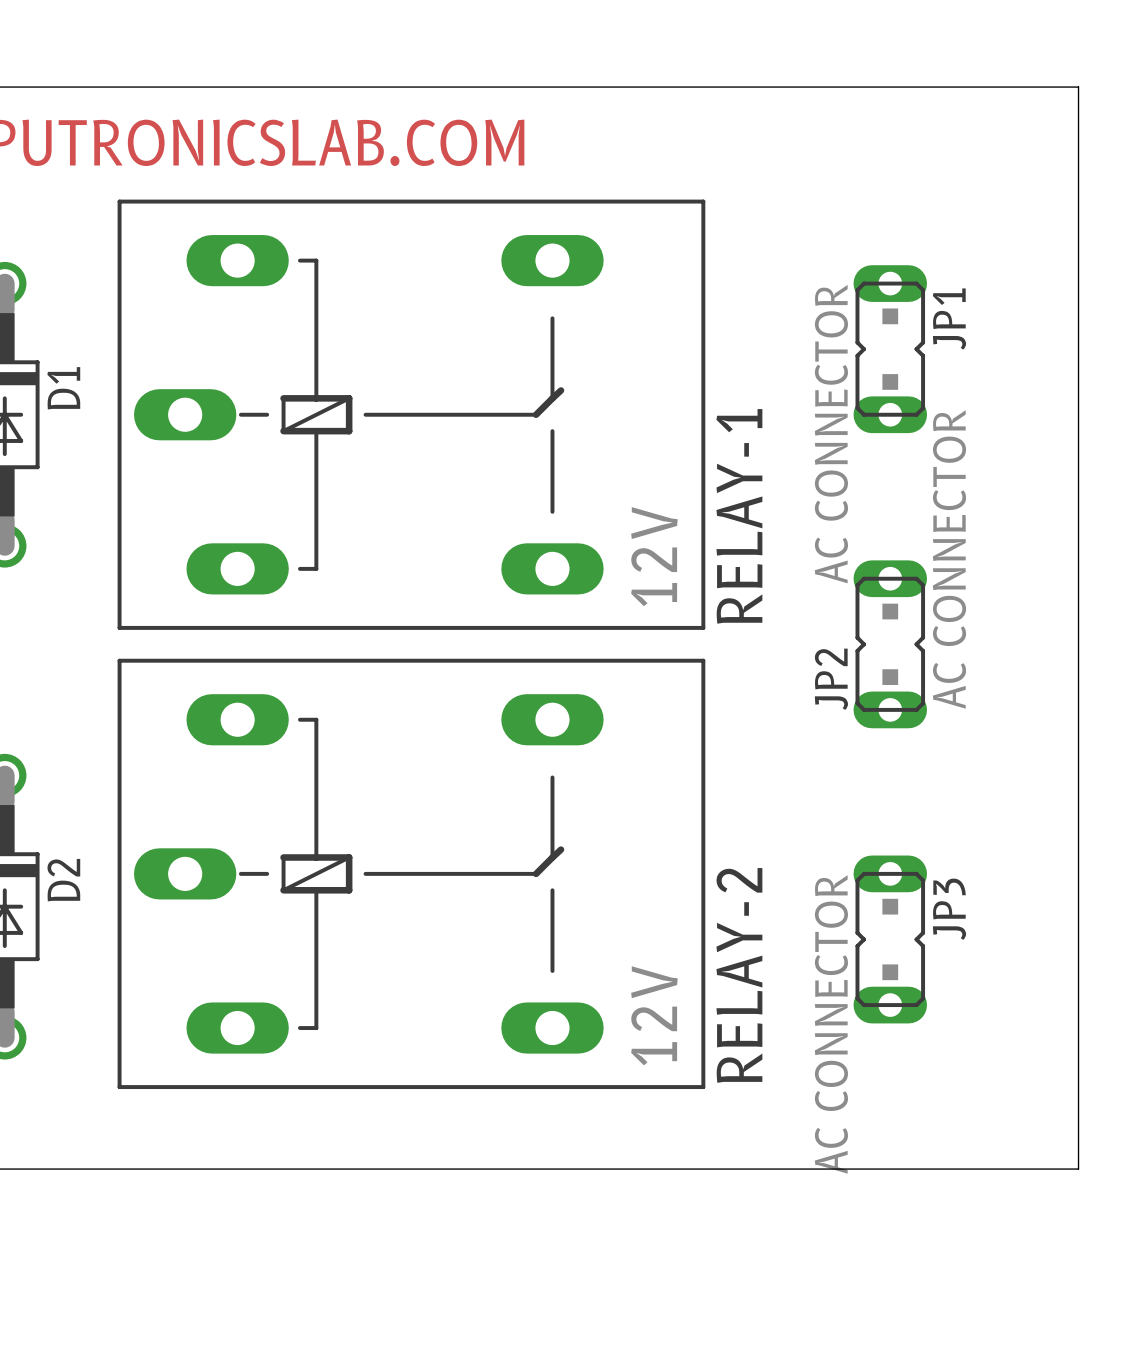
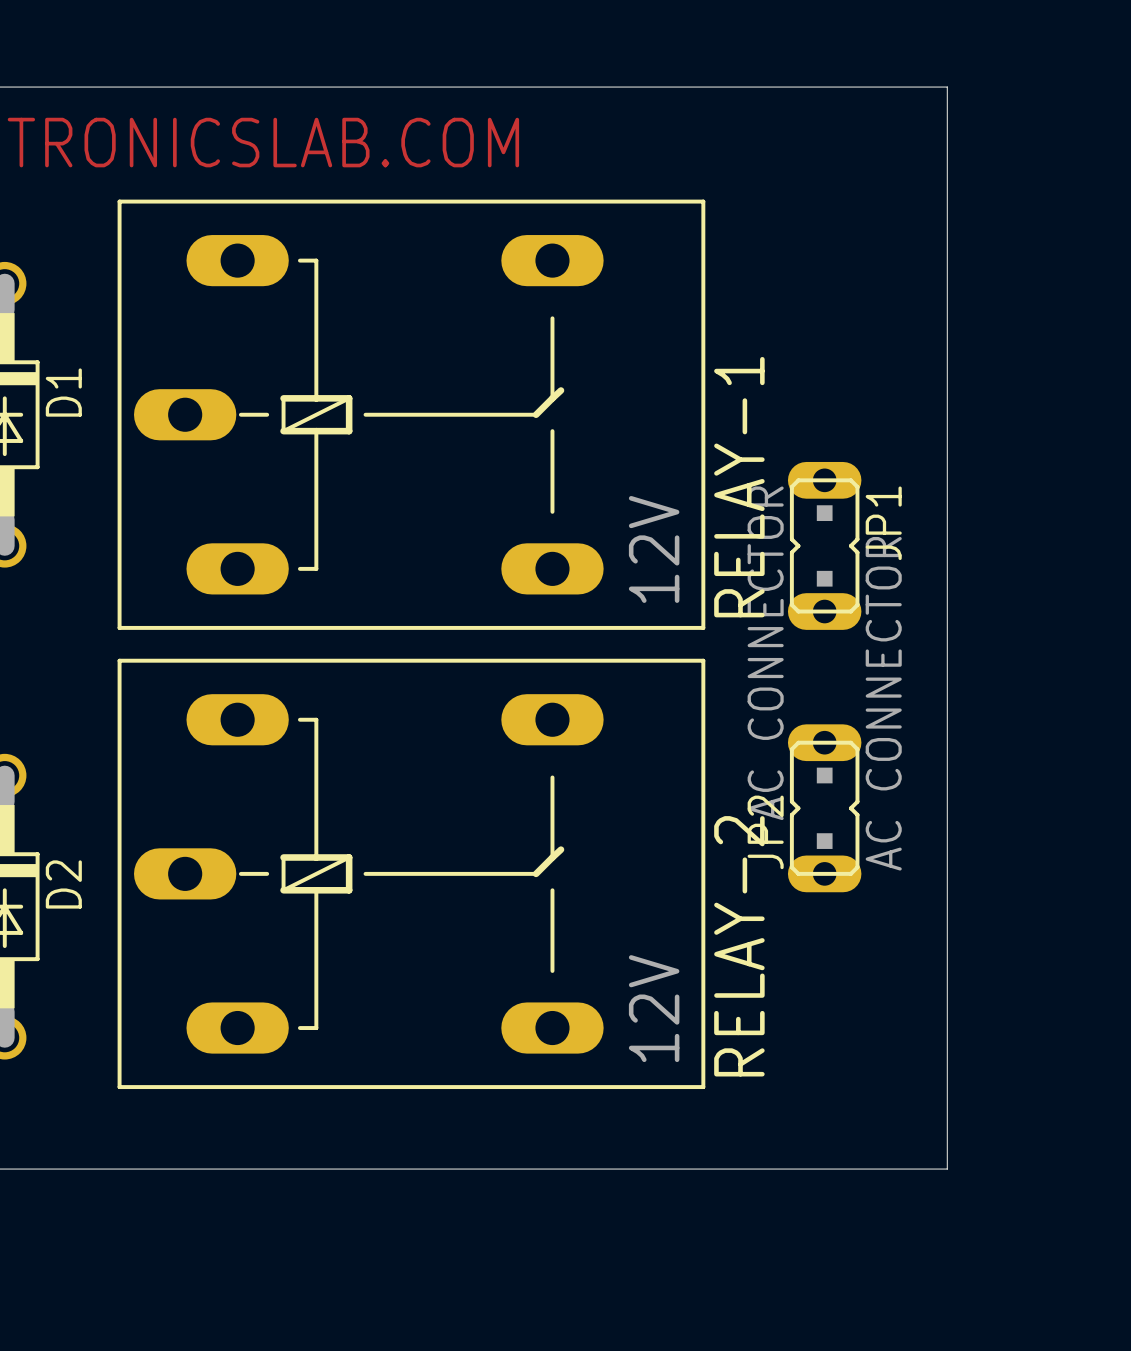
board edge: (947, 87) (1078, 87) (1078, 1169) (947, 1169) -> (947, 87) (947, 1169)
JP1 position: (890, 349) -> (824, 545)
JP2 position: (890, 644) -> (824, 808)
JP3: AC CONNECTOR (890, 939) -> none

